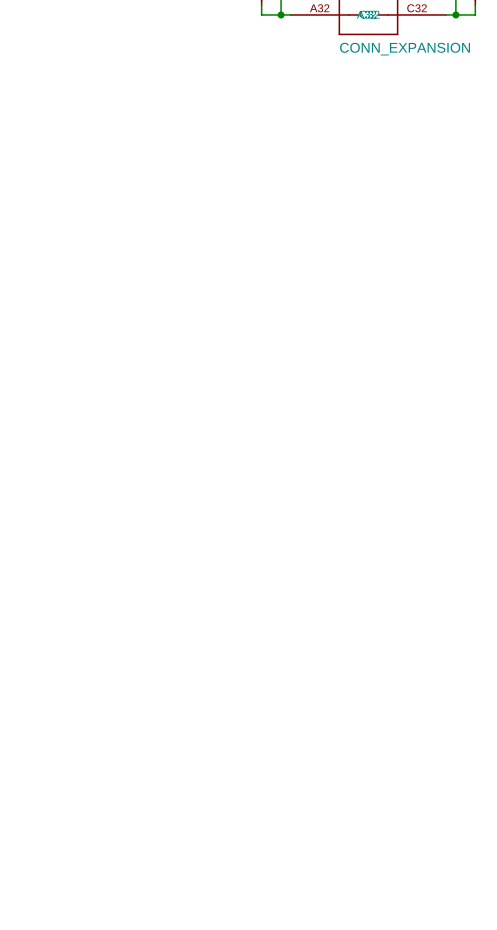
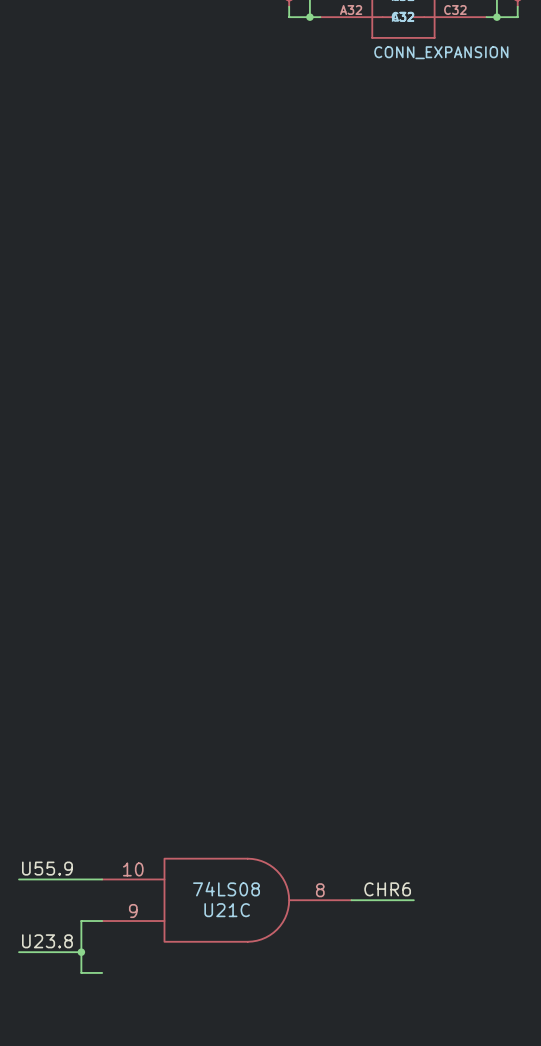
label: none -> U55.9 (47, 868)
wire: none -> (19, 879) (102, 879)
label: none -> CHR6 (387, 889)
U21C: none -> 74LS08 (226, 900)
wire: none -> (351, 900) (413, 900)
wire: none -> (102, 921) (81, 921) (81, 972) (102, 972)
label: none -> U23.8 (47, 941)
wire: none -> (19, 952) (81, 952)
junction: none -> (81, 952)

